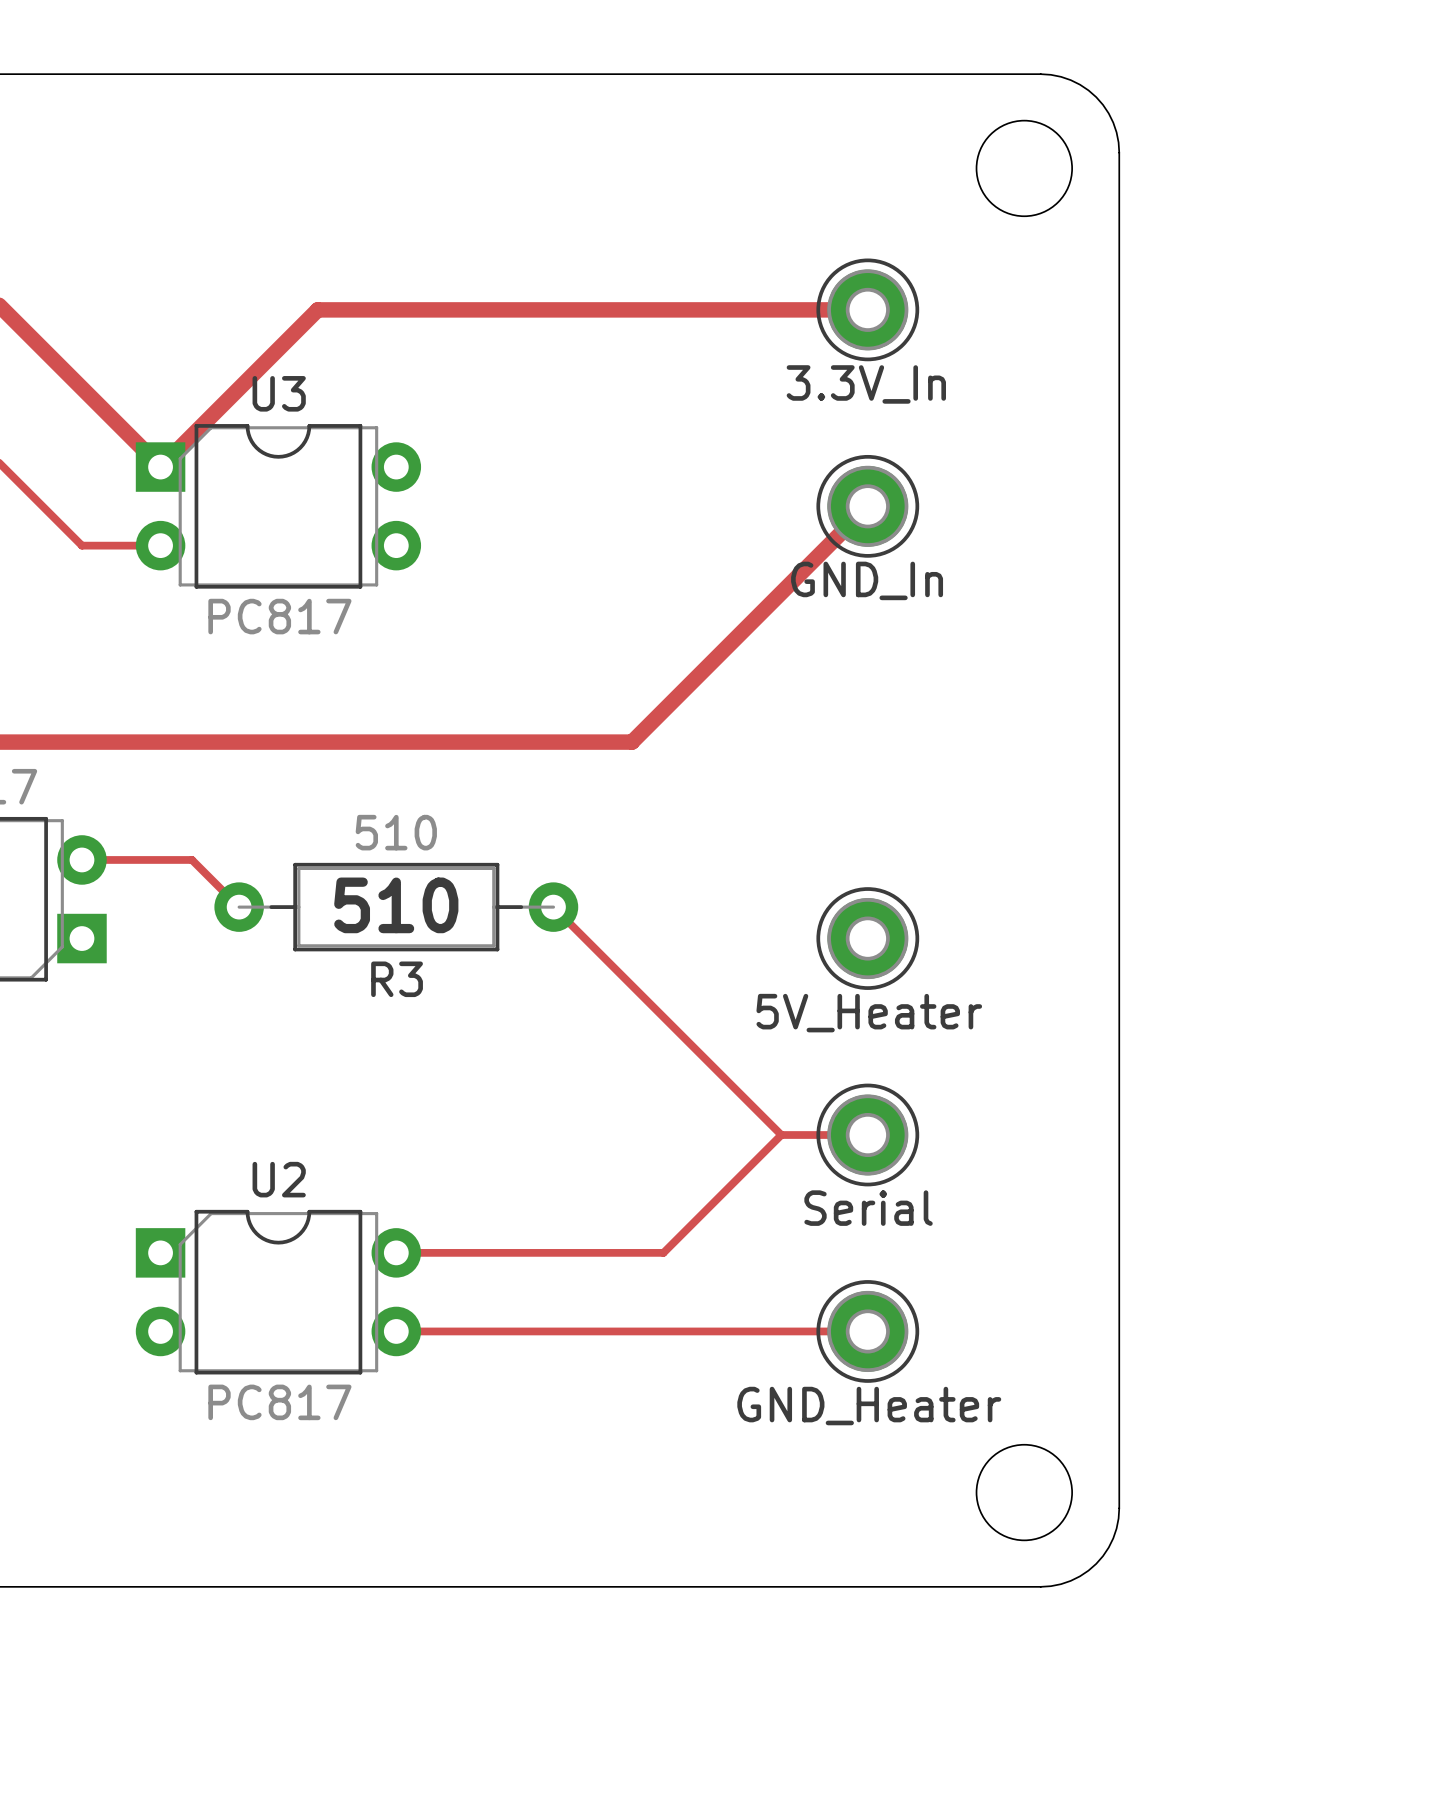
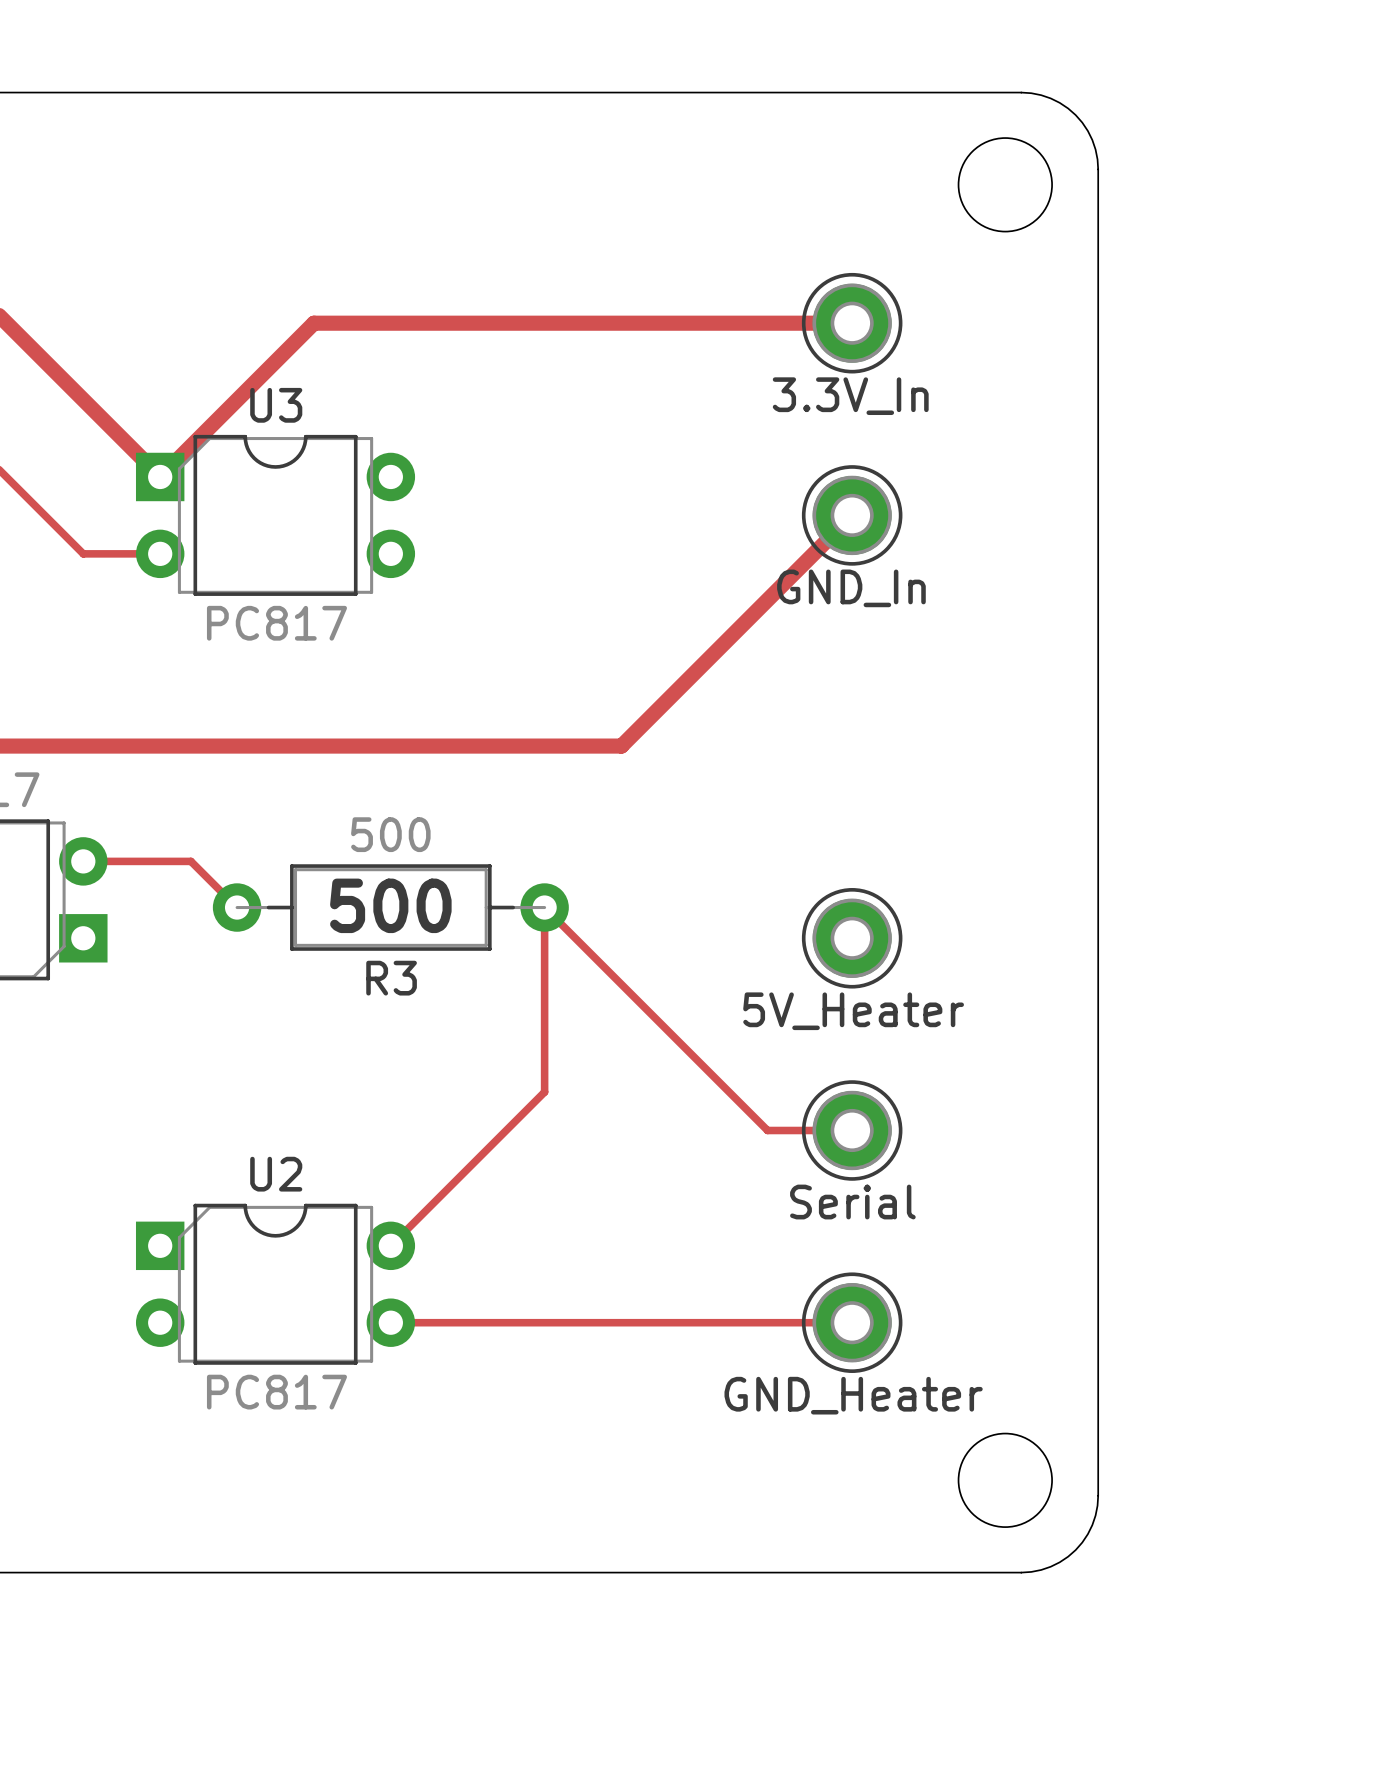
R3 value: 510 (396, 832) -> 500 (390, 834)
text: 510 (396, 905) -> 500 (390, 905)
track: (781, 1135) (663, 1252) (396, 1252) -> (544, 907) (544, 1092) (390, 1245)

